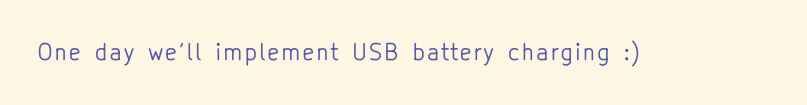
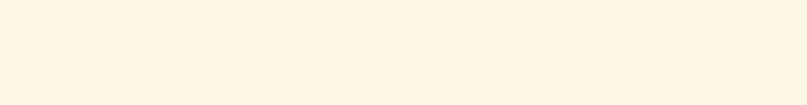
text: One day we'll implement USB battery charging :) (338, 53) -> none

